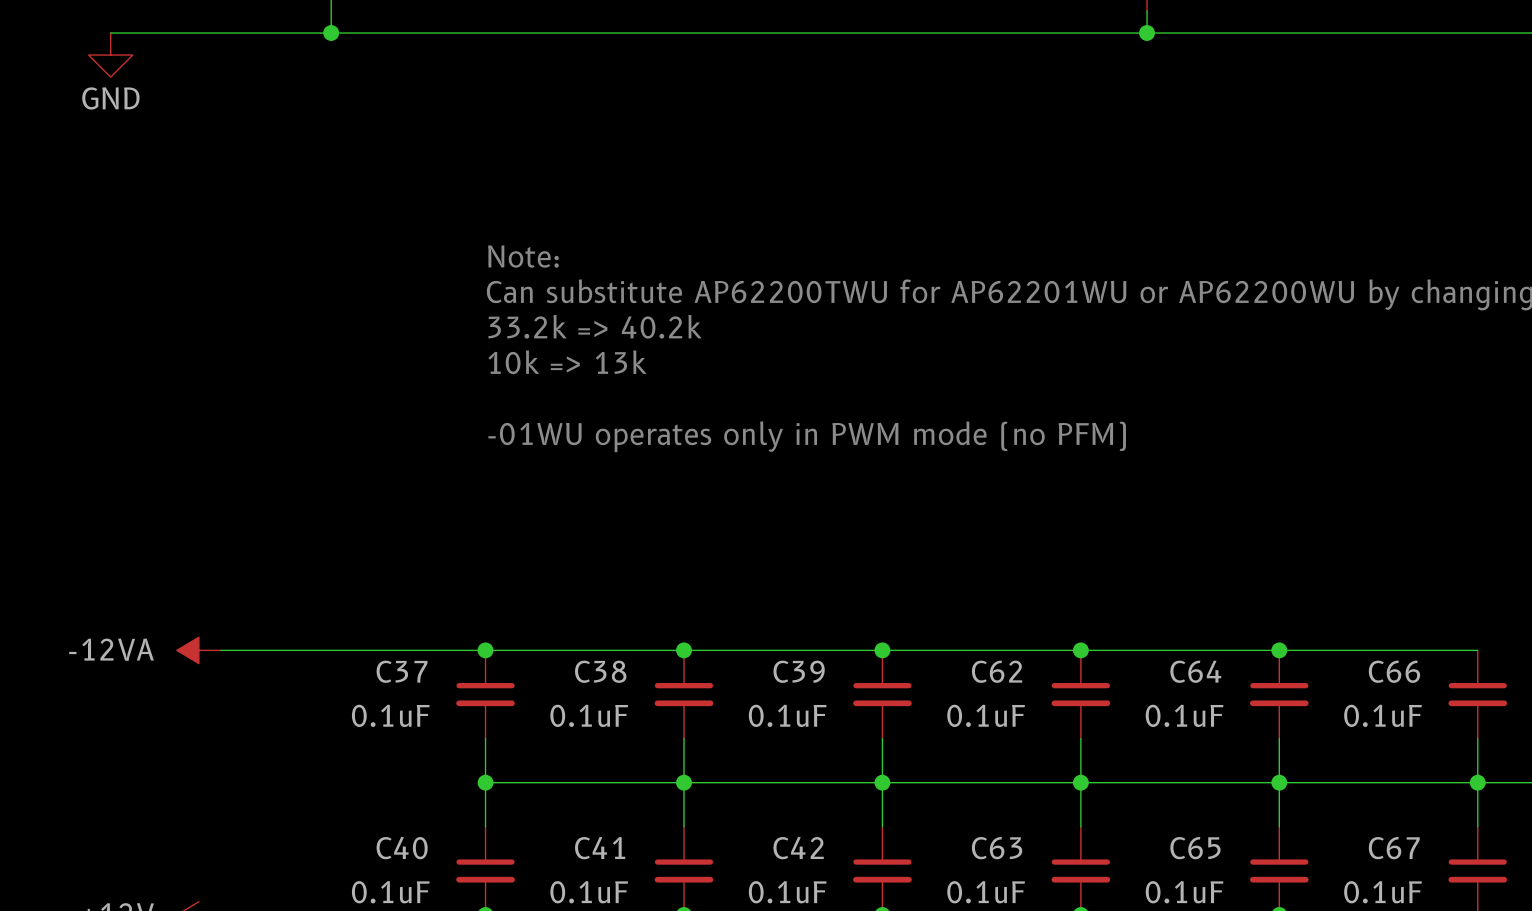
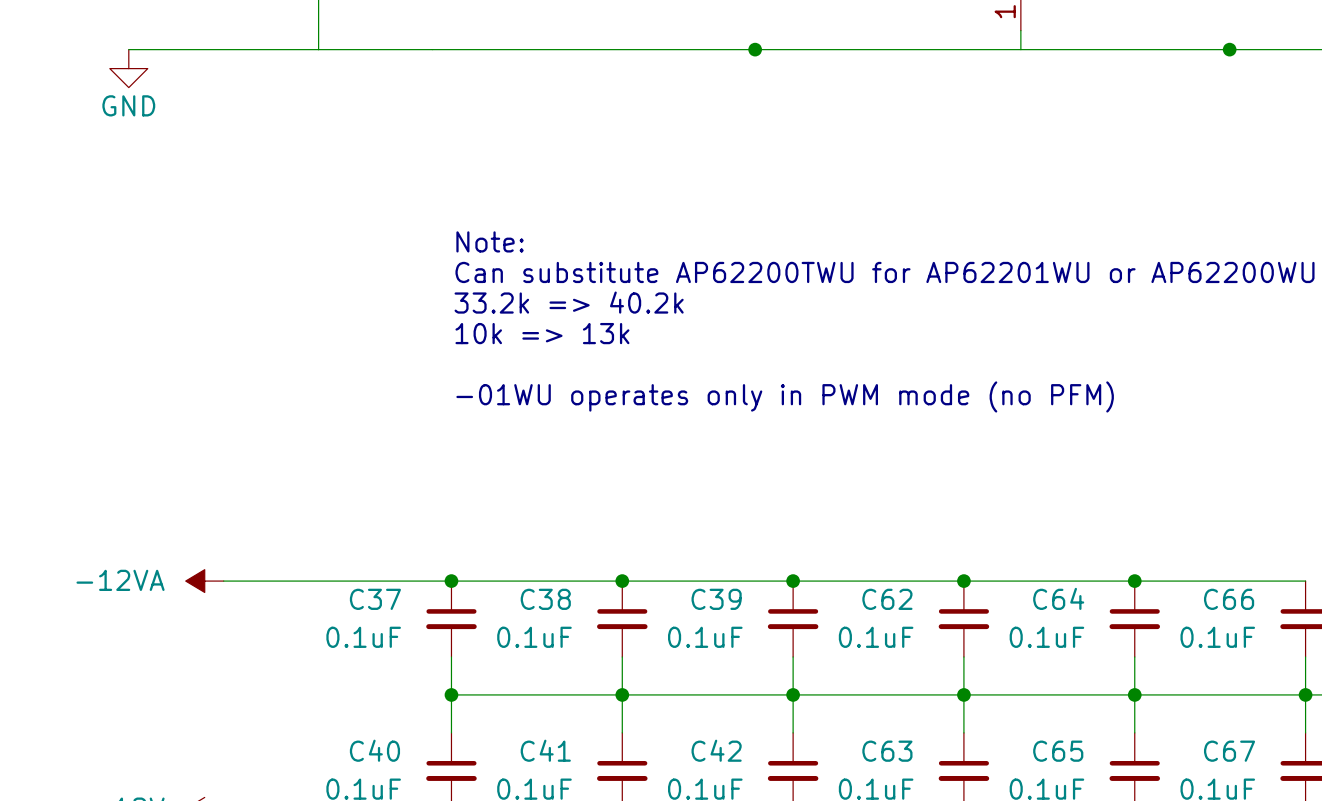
junction: (331, 33) -> none
junction: none -> (755, 49)
junction: (1147, 33) -> none
junction: none -> (1229, 49)

